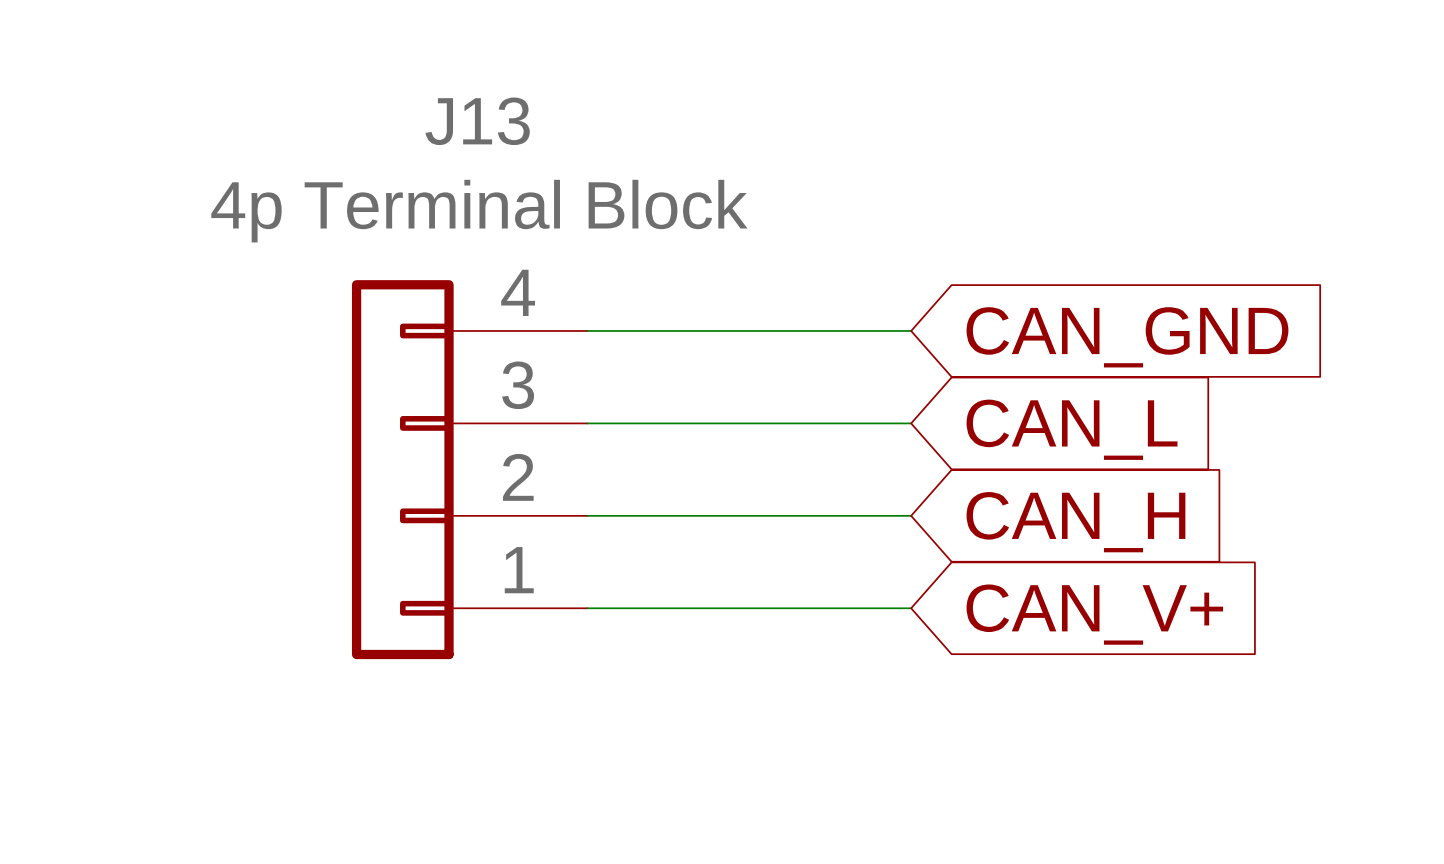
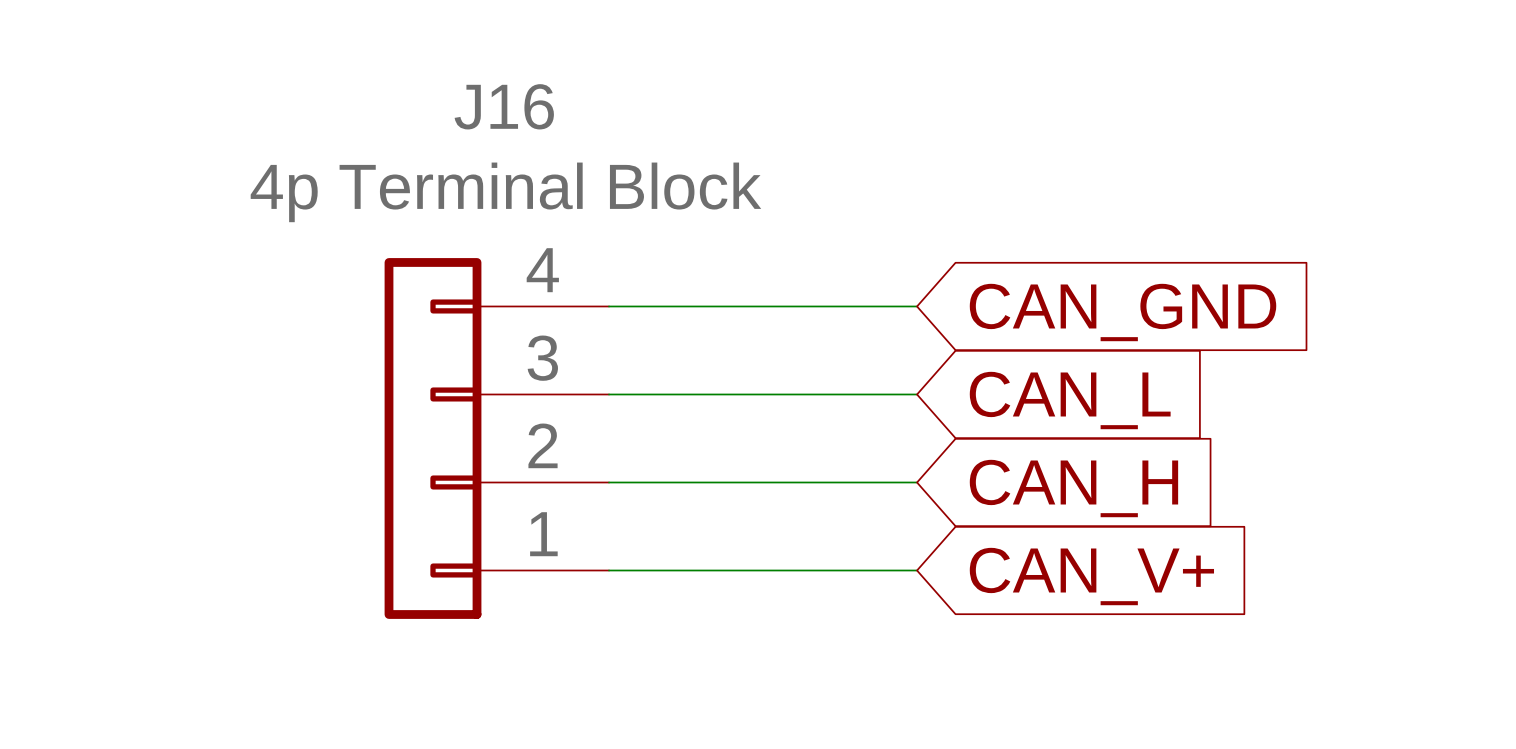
J13 name: J13 (477, 121) -> J16 (504, 106)

